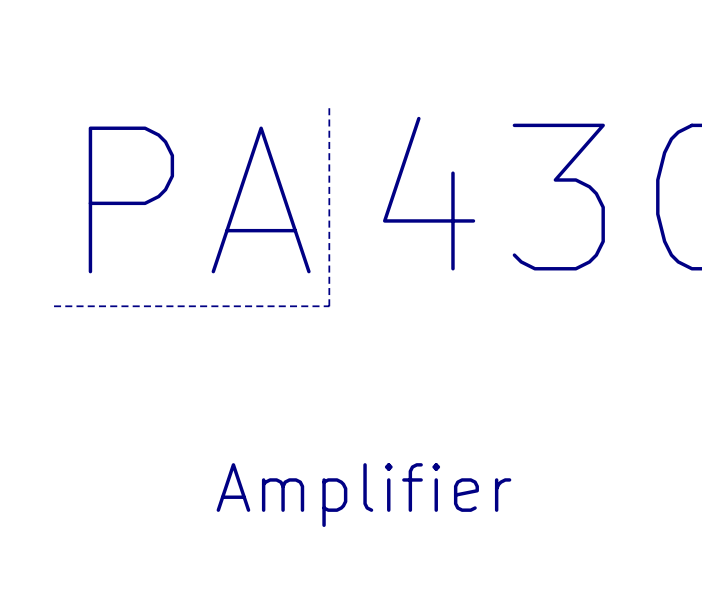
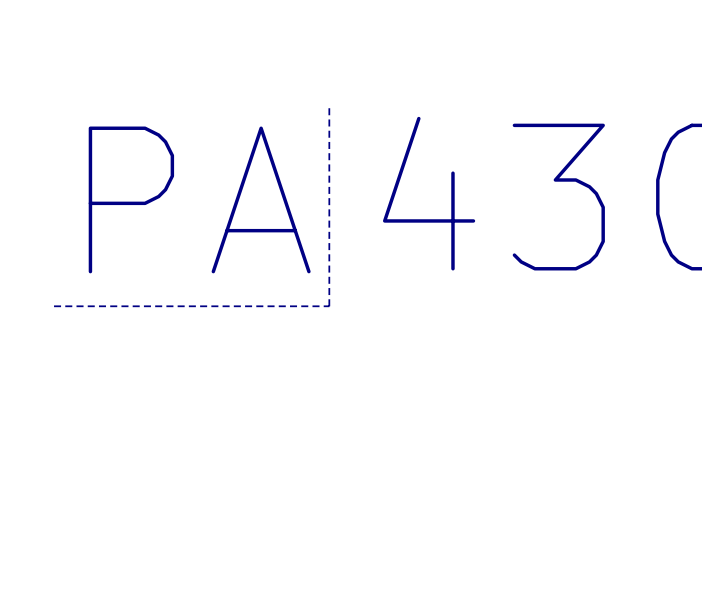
text: Amplifier (363, 495) -> none

